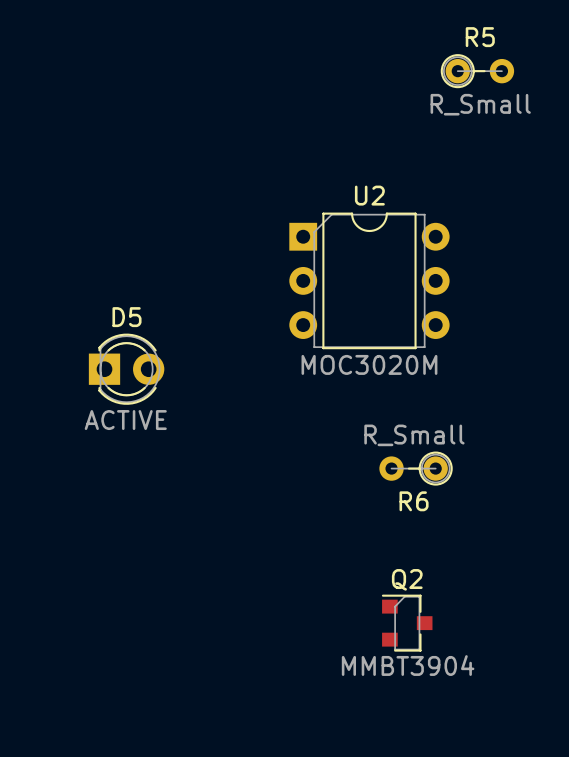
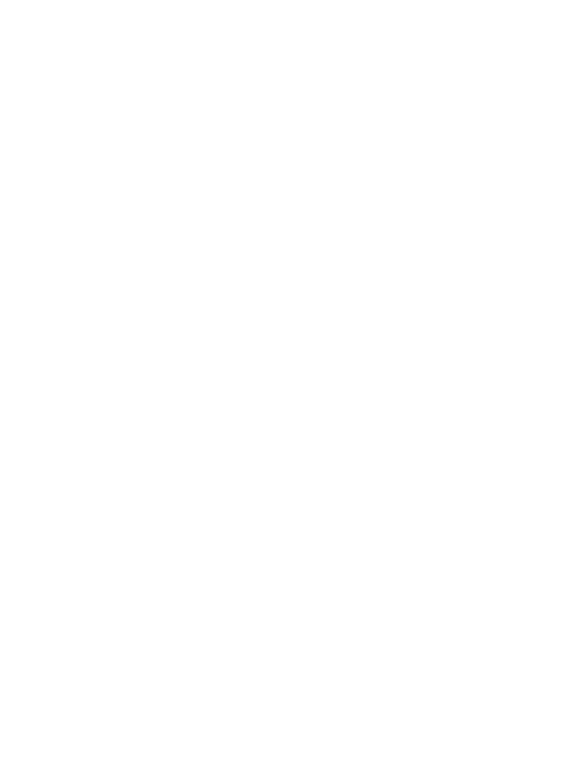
R5: R_Small (477, 71) -> none
U2: MOC3020M (369, 280) -> none
D5: ACTIVE (126, 369) -> none
R6: R_Small (416, 468) -> none
Q2: MMBT3904 (407, 623) -> none

